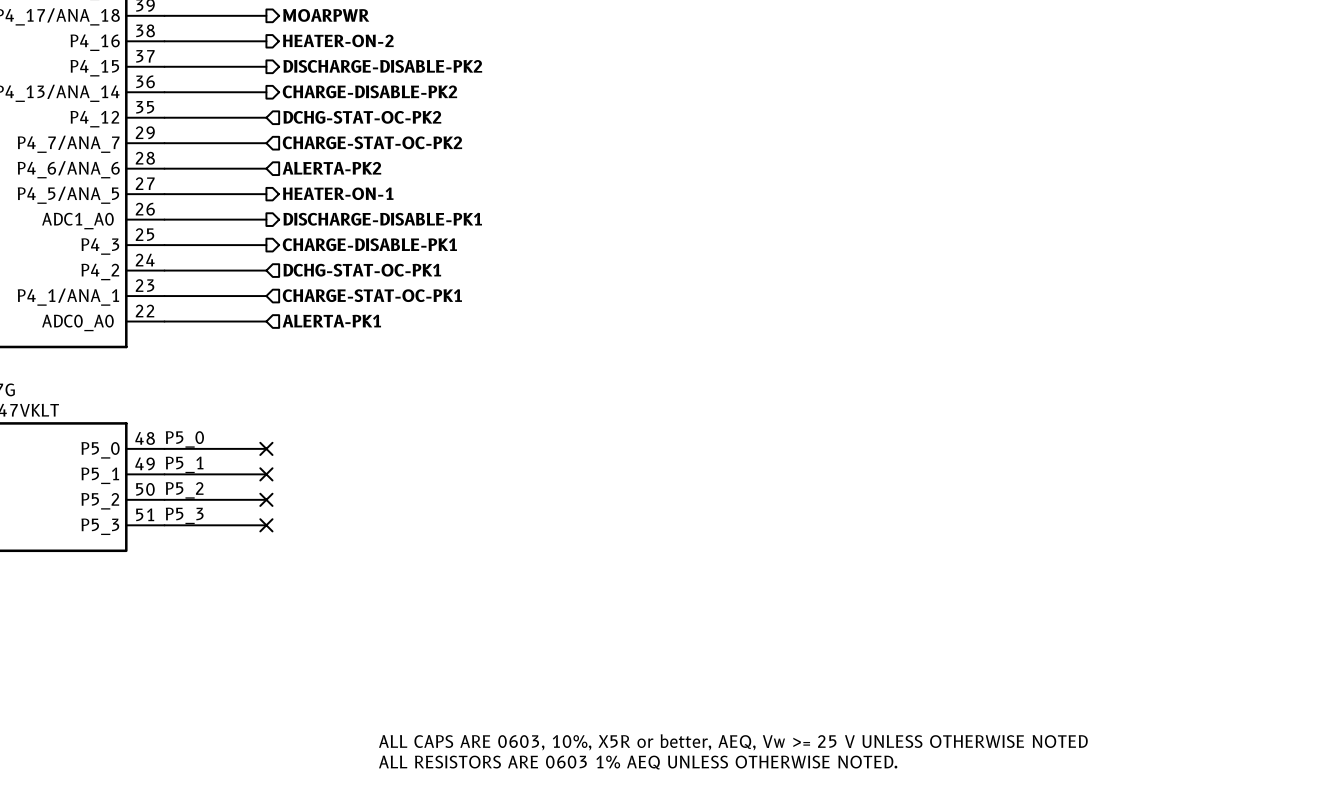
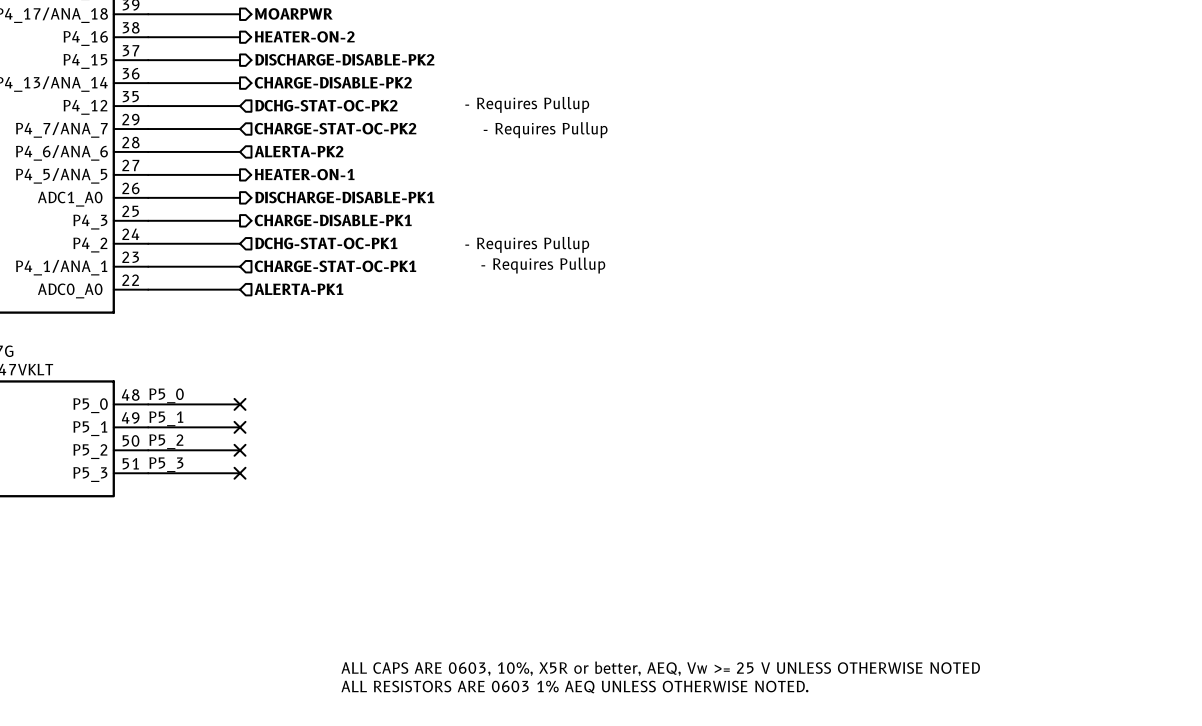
text: none -> - Requires Pullup (527, 104)
text: none -> - Requires Pullup (545, 130)
text: none -> - Requires Pullup (527, 244)
text: none -> - Requires Pullup (543, 265)

